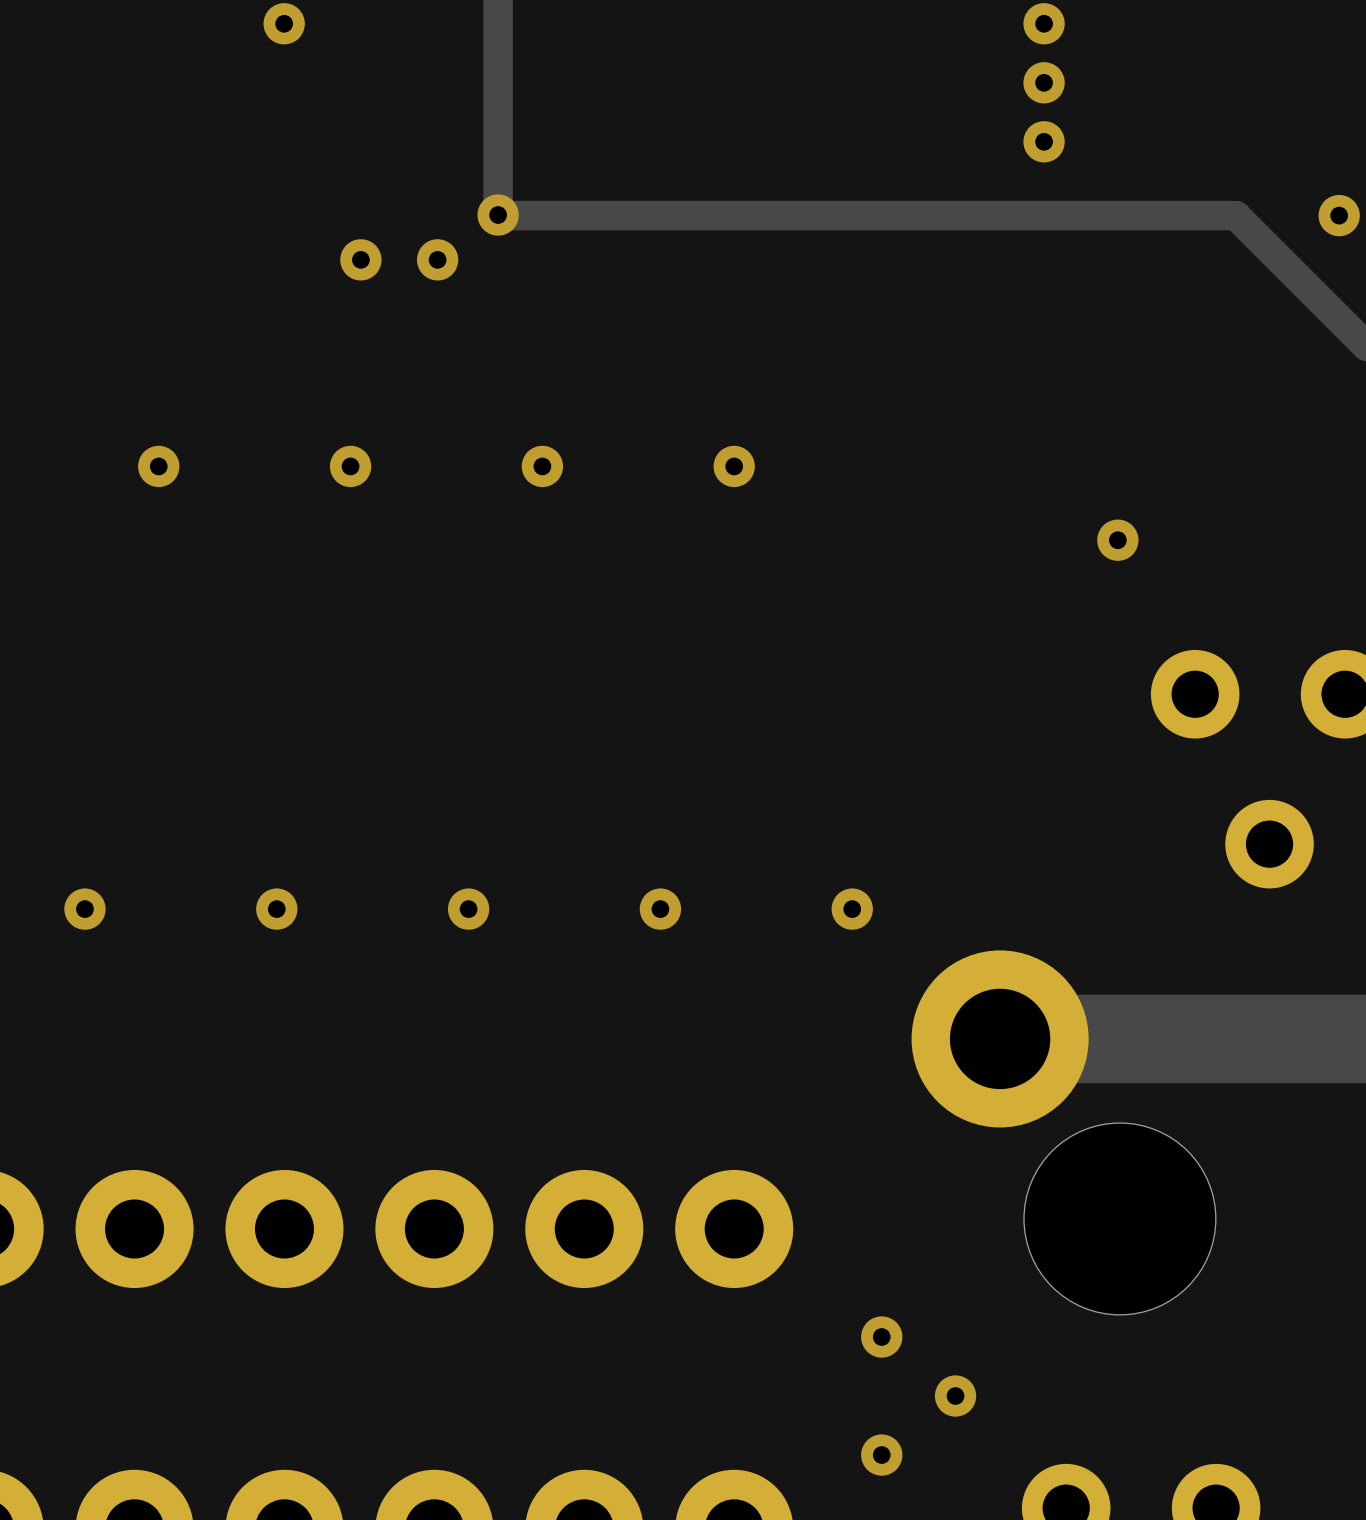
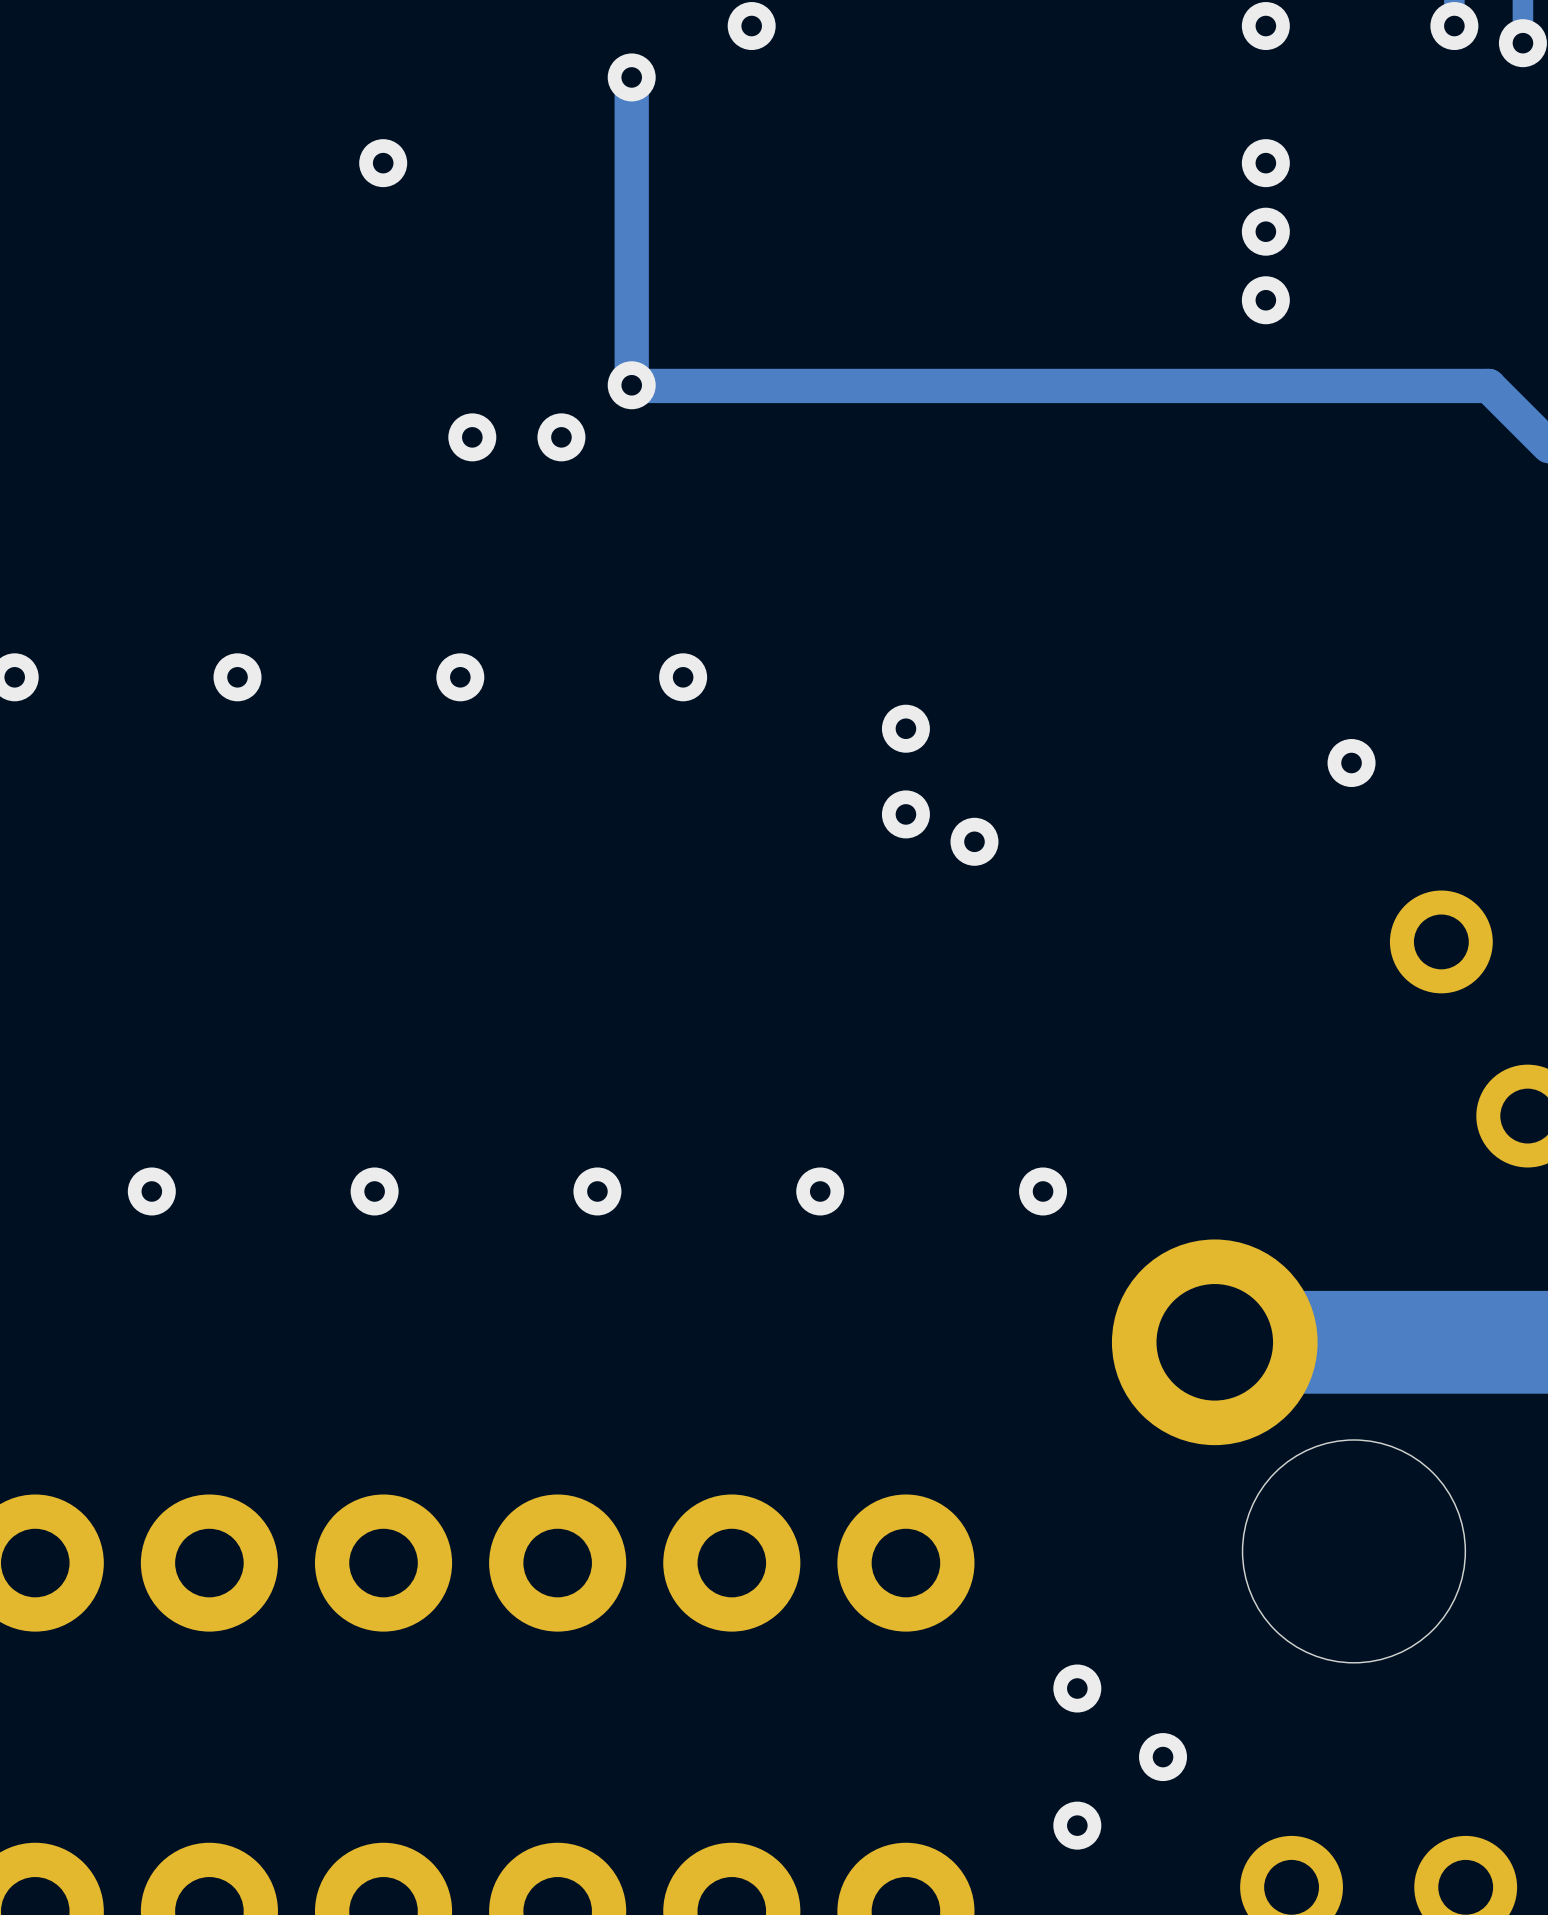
via position: (734, 466) -> (905, 728)
via: none -> (905, 814)
via: none -> (974, 841)

